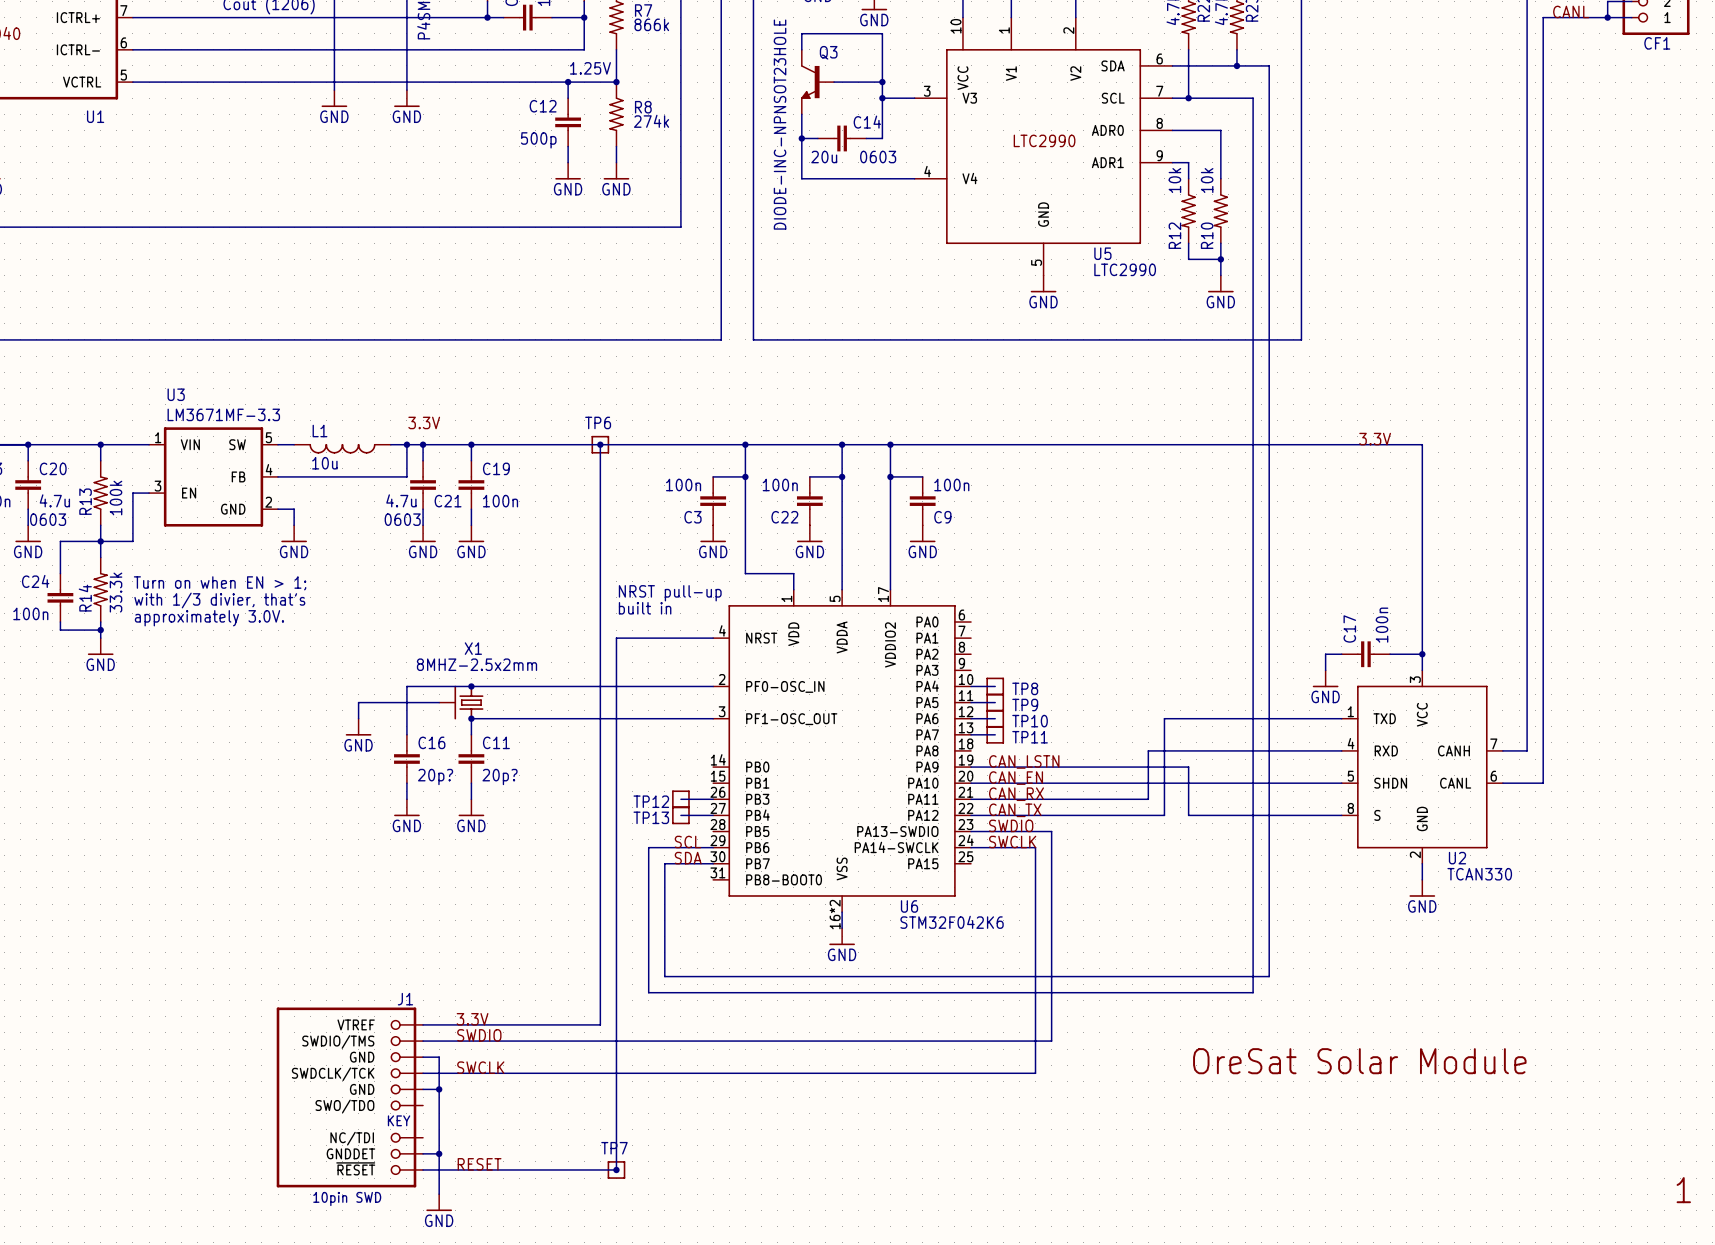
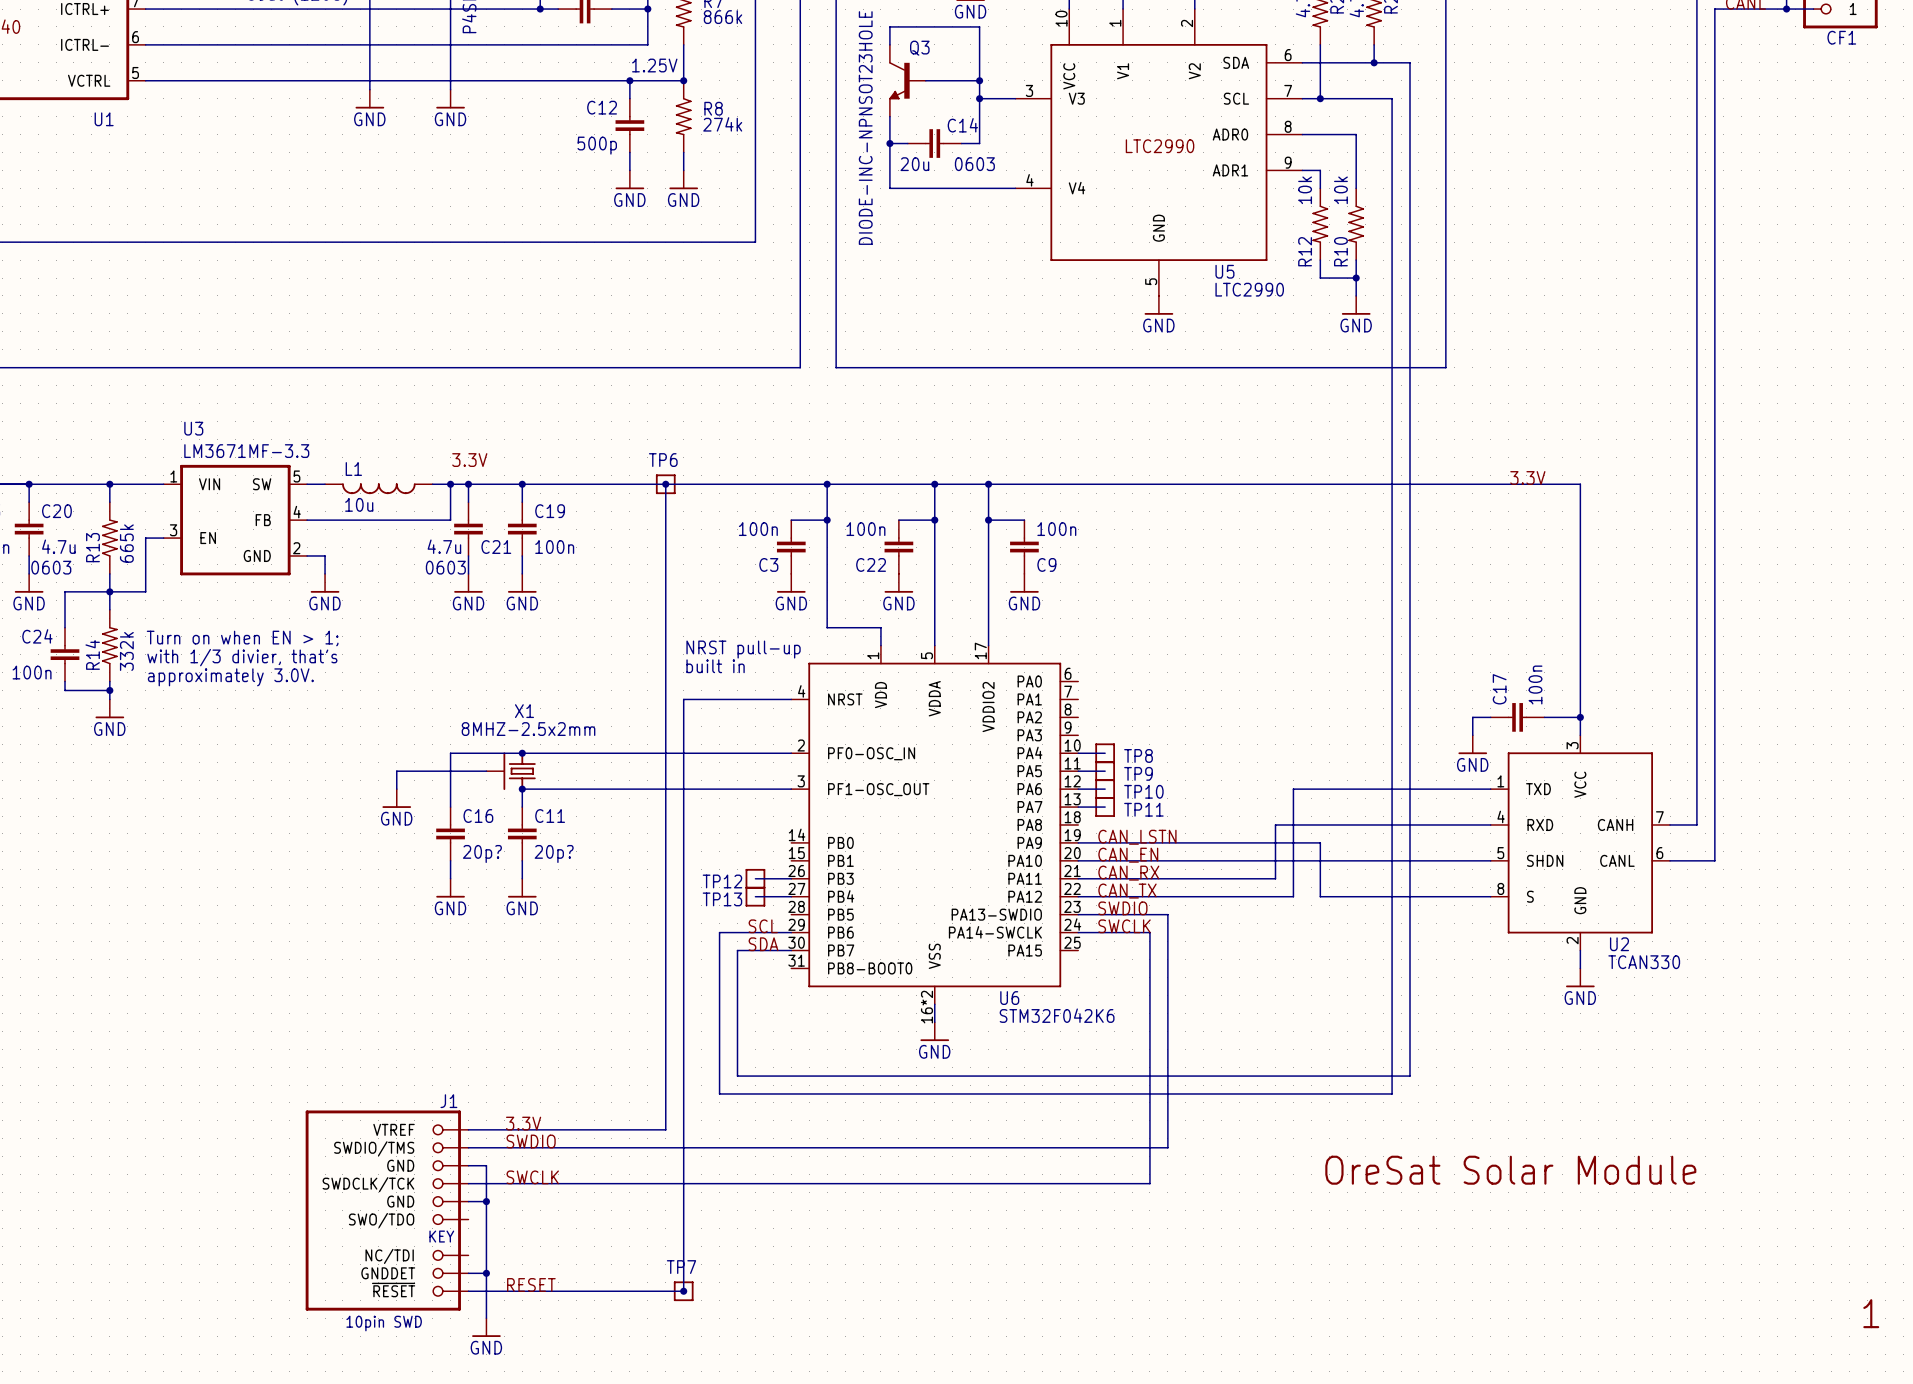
R13 value: 100k (116, 498) -> 665k (126, 543)
R14 value: 33.3k (116, 592) -> 332k (126, 651)

